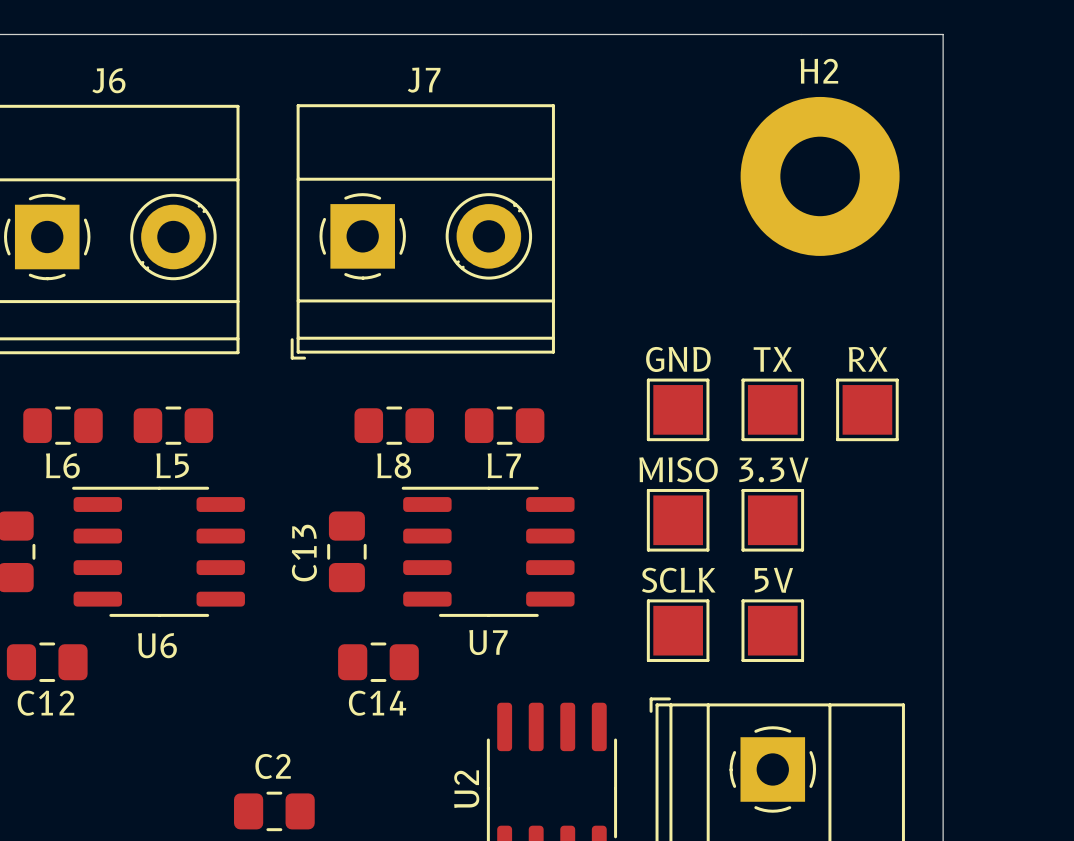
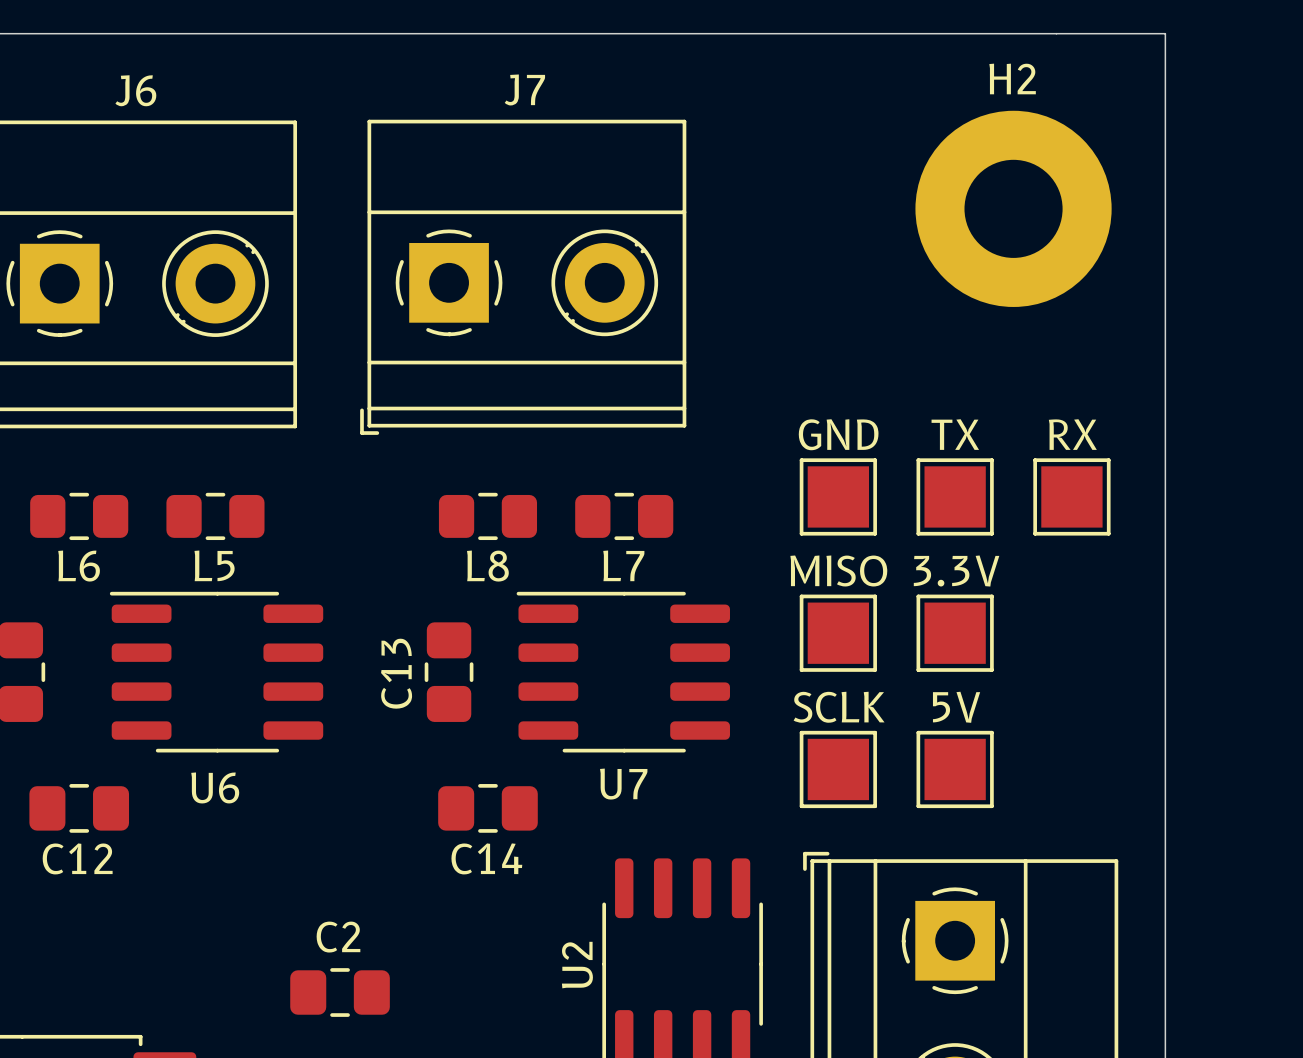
U6 position: (158, 551) -> (216, 672)
C13 position: (346, 551) -> (449, 672)
U7 position: (488, 551) -> (623, 672)
C12 position: (47, 662) -> (79, 808)
C14 position: (378, 662) -> (487, 808)

